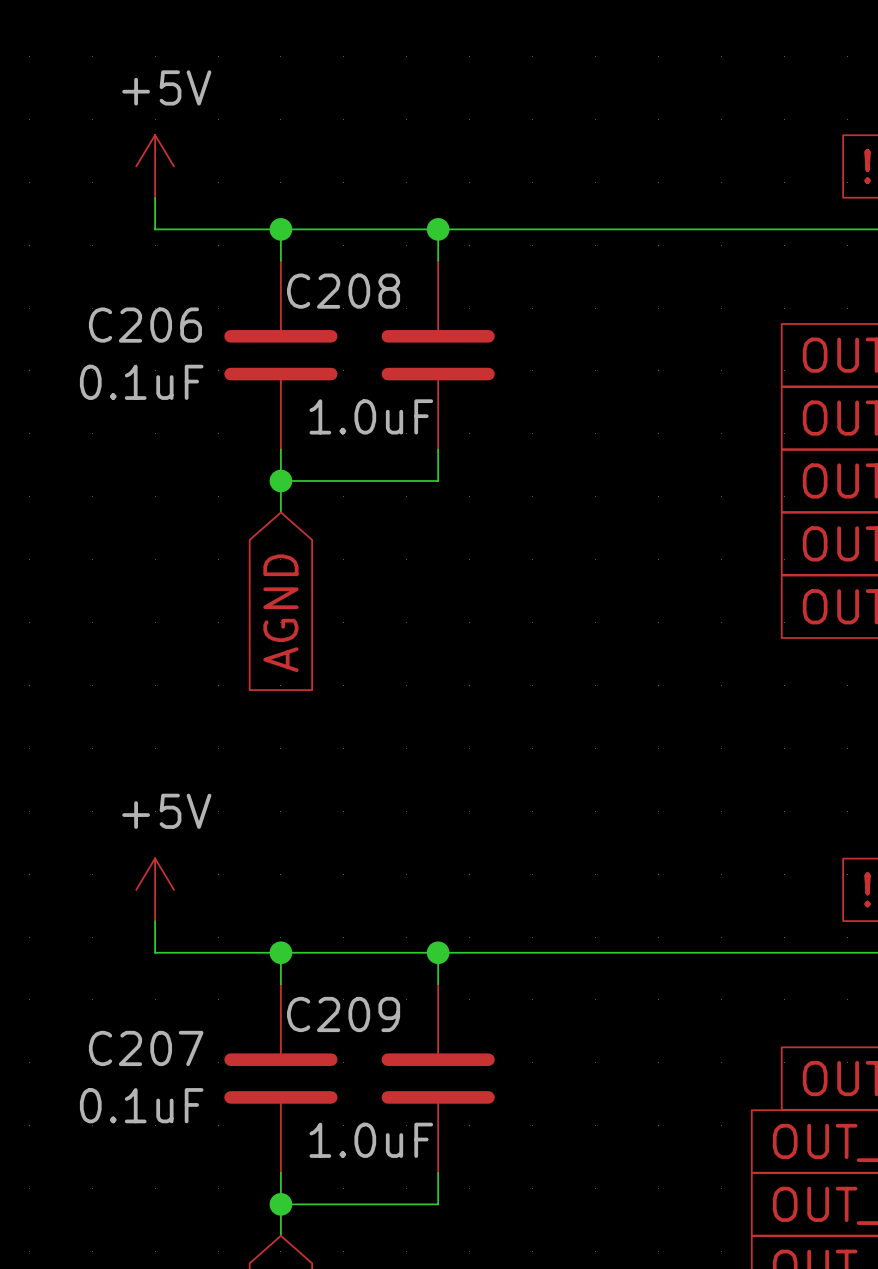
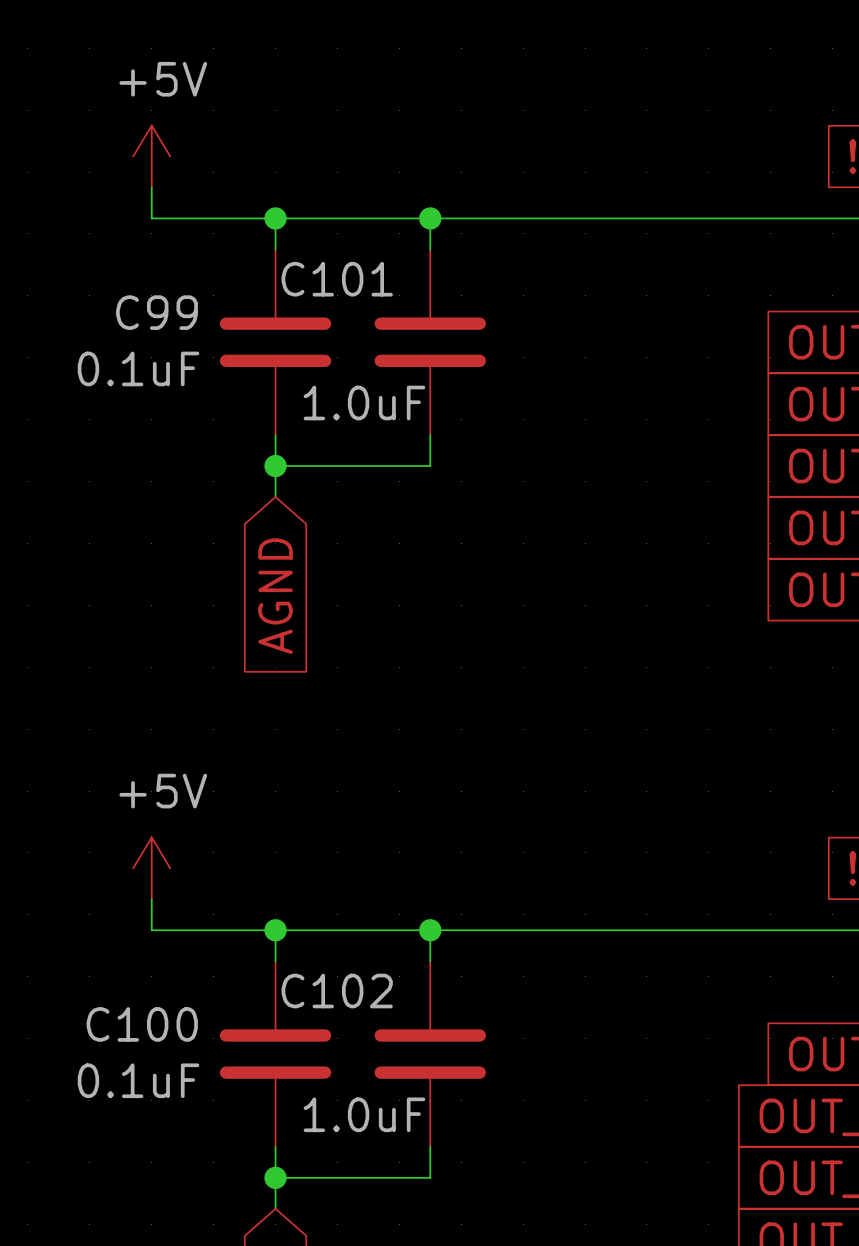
C208 name: C208 (343, 291) -> C101 (337, 279)
C206 name: C206 (145, 325) -> C99 (156, 312)
C209 name: C209 (343, 1014) -> C102 (337, 991)
C207 name: C207 (146, 1048) -> C100 (142, 1024)

